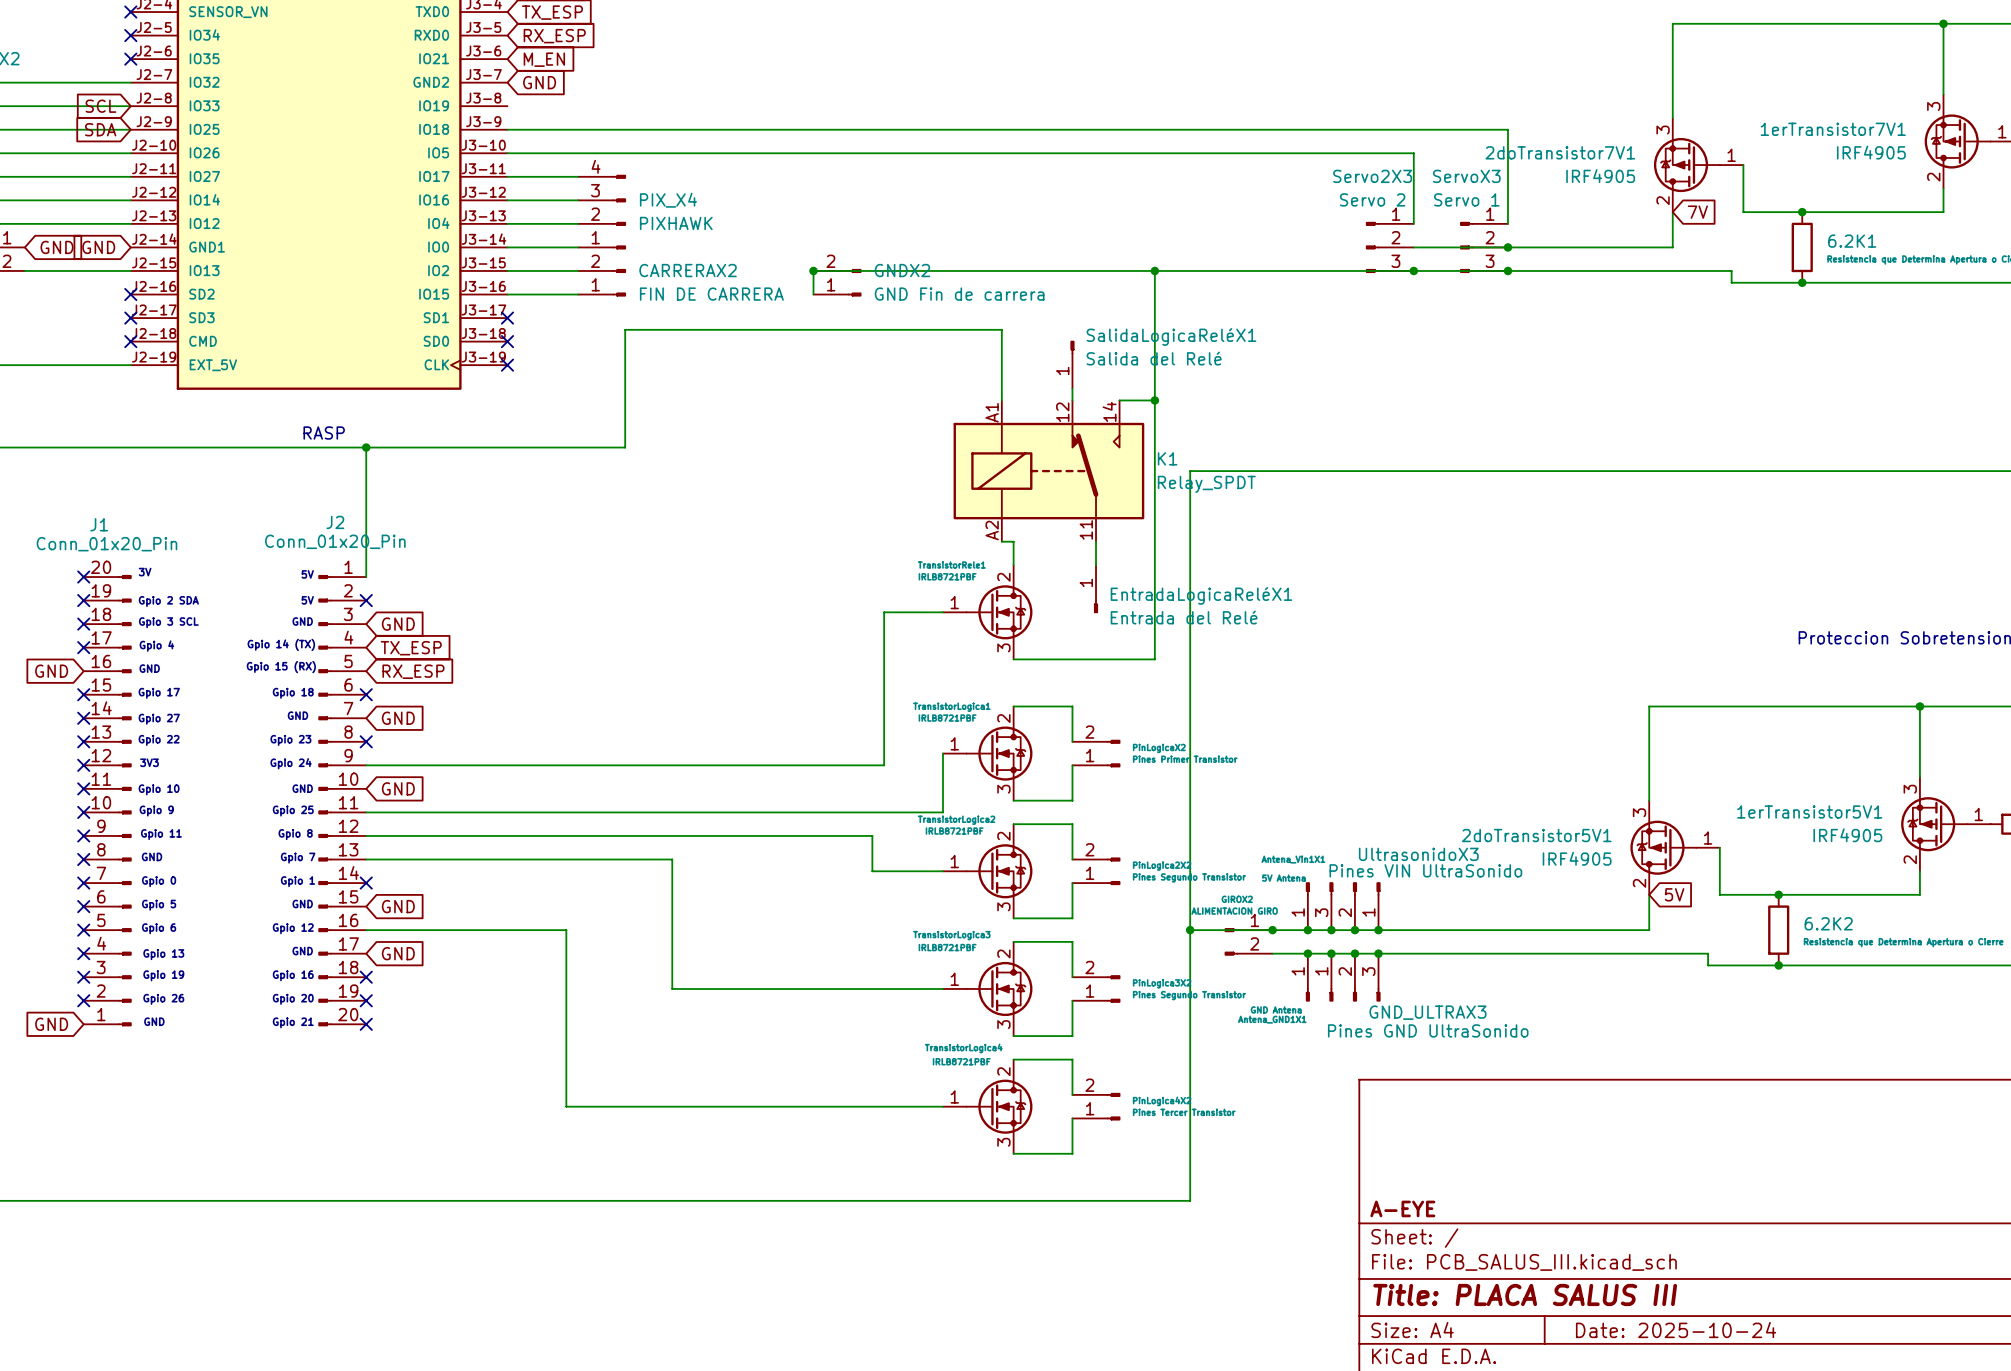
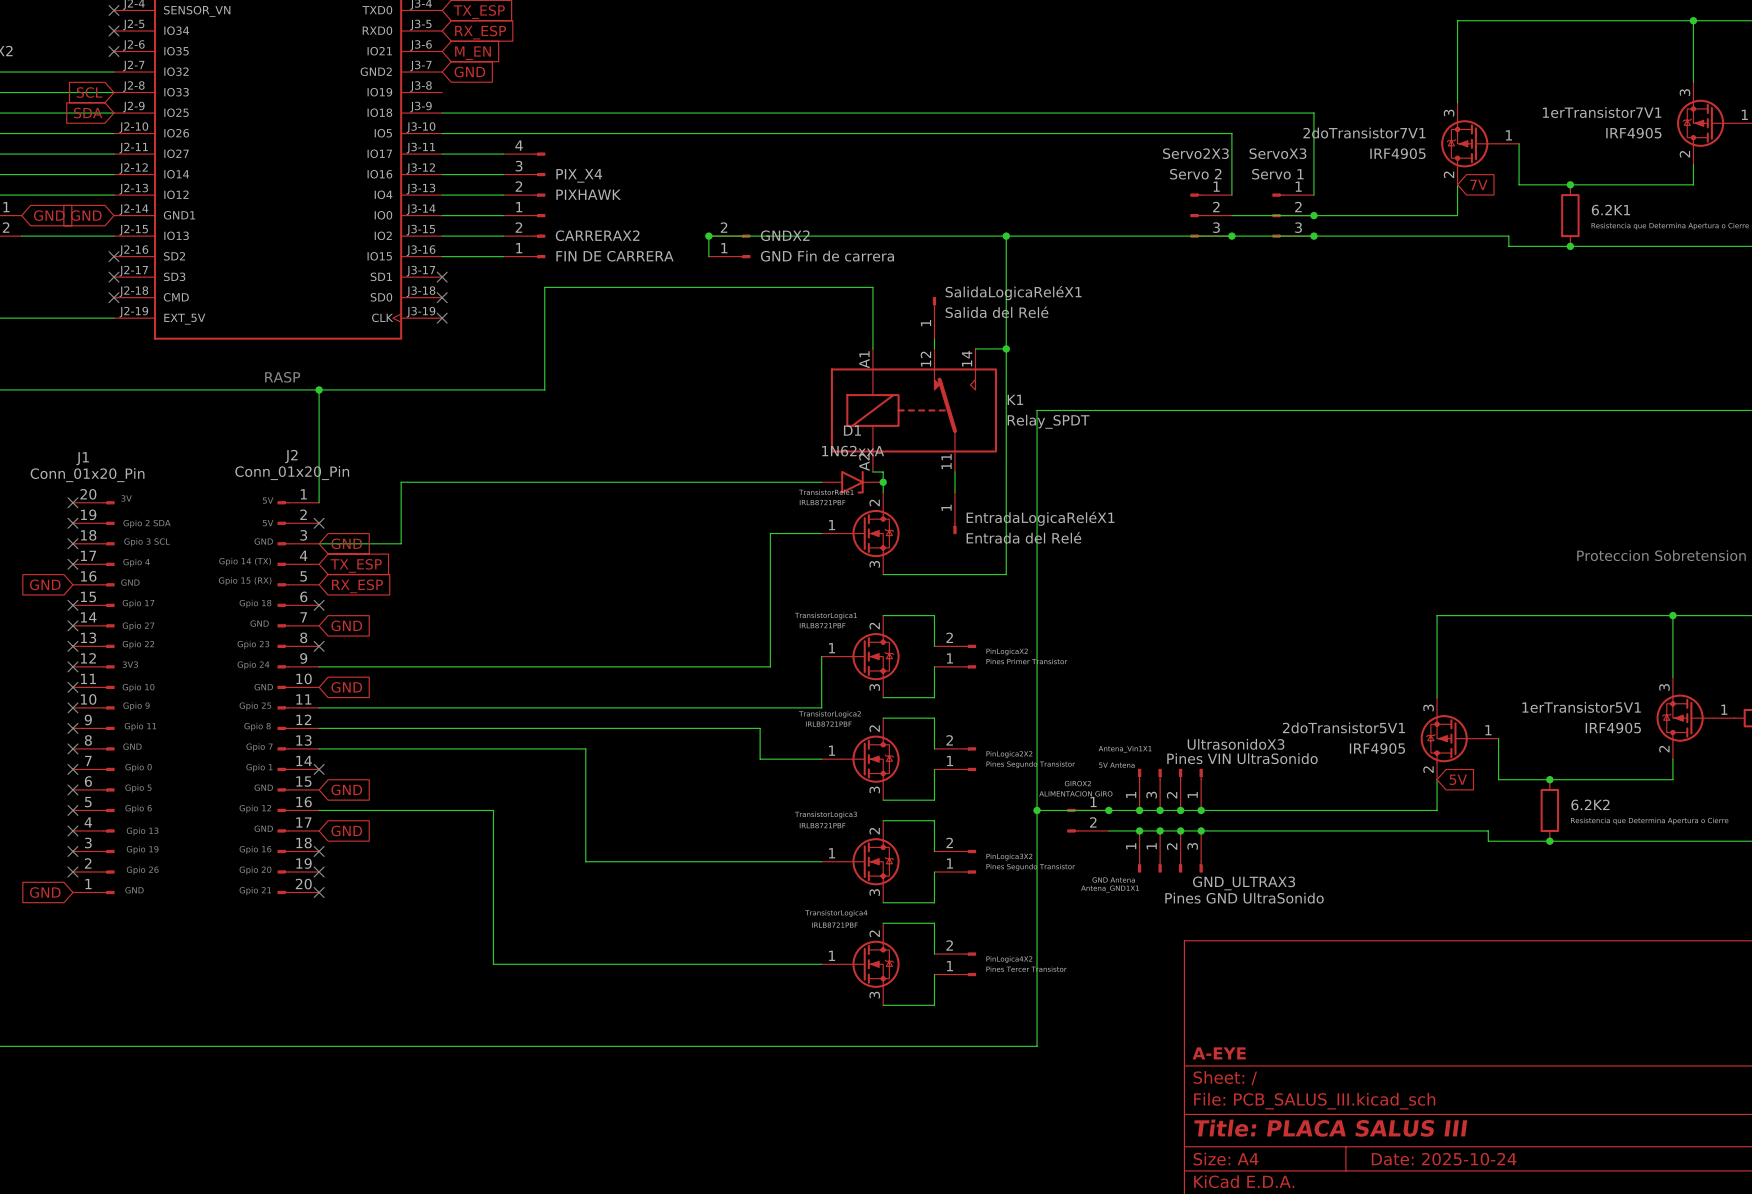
wire: none -> (821, 482) (401, 482) (401, 543) (319, 543)
D1: none -> 1N62xxA (852, 482)
junction: none -> (883, 482)

